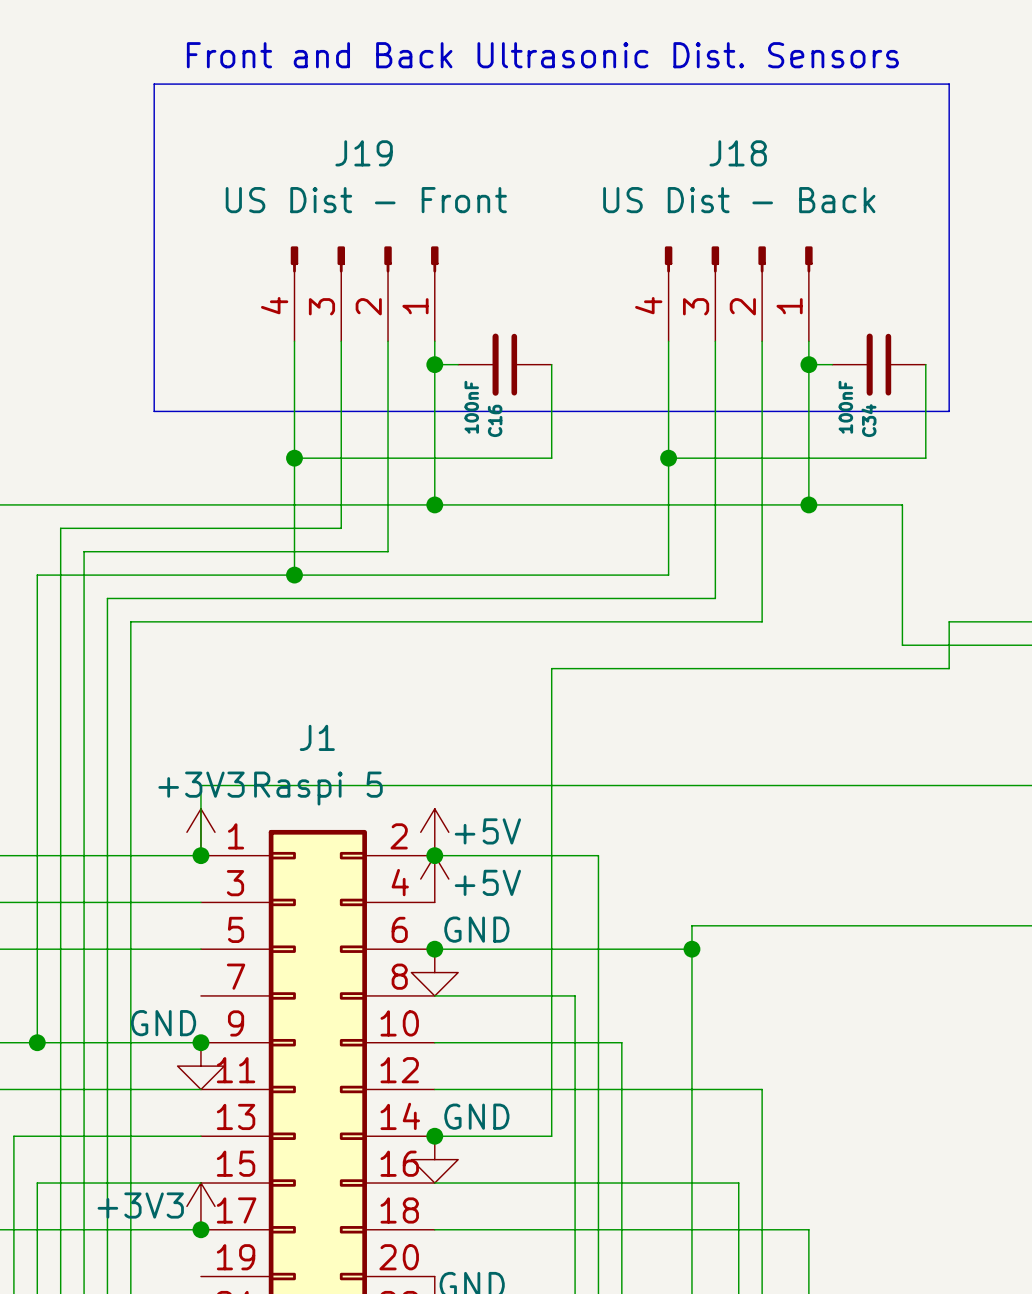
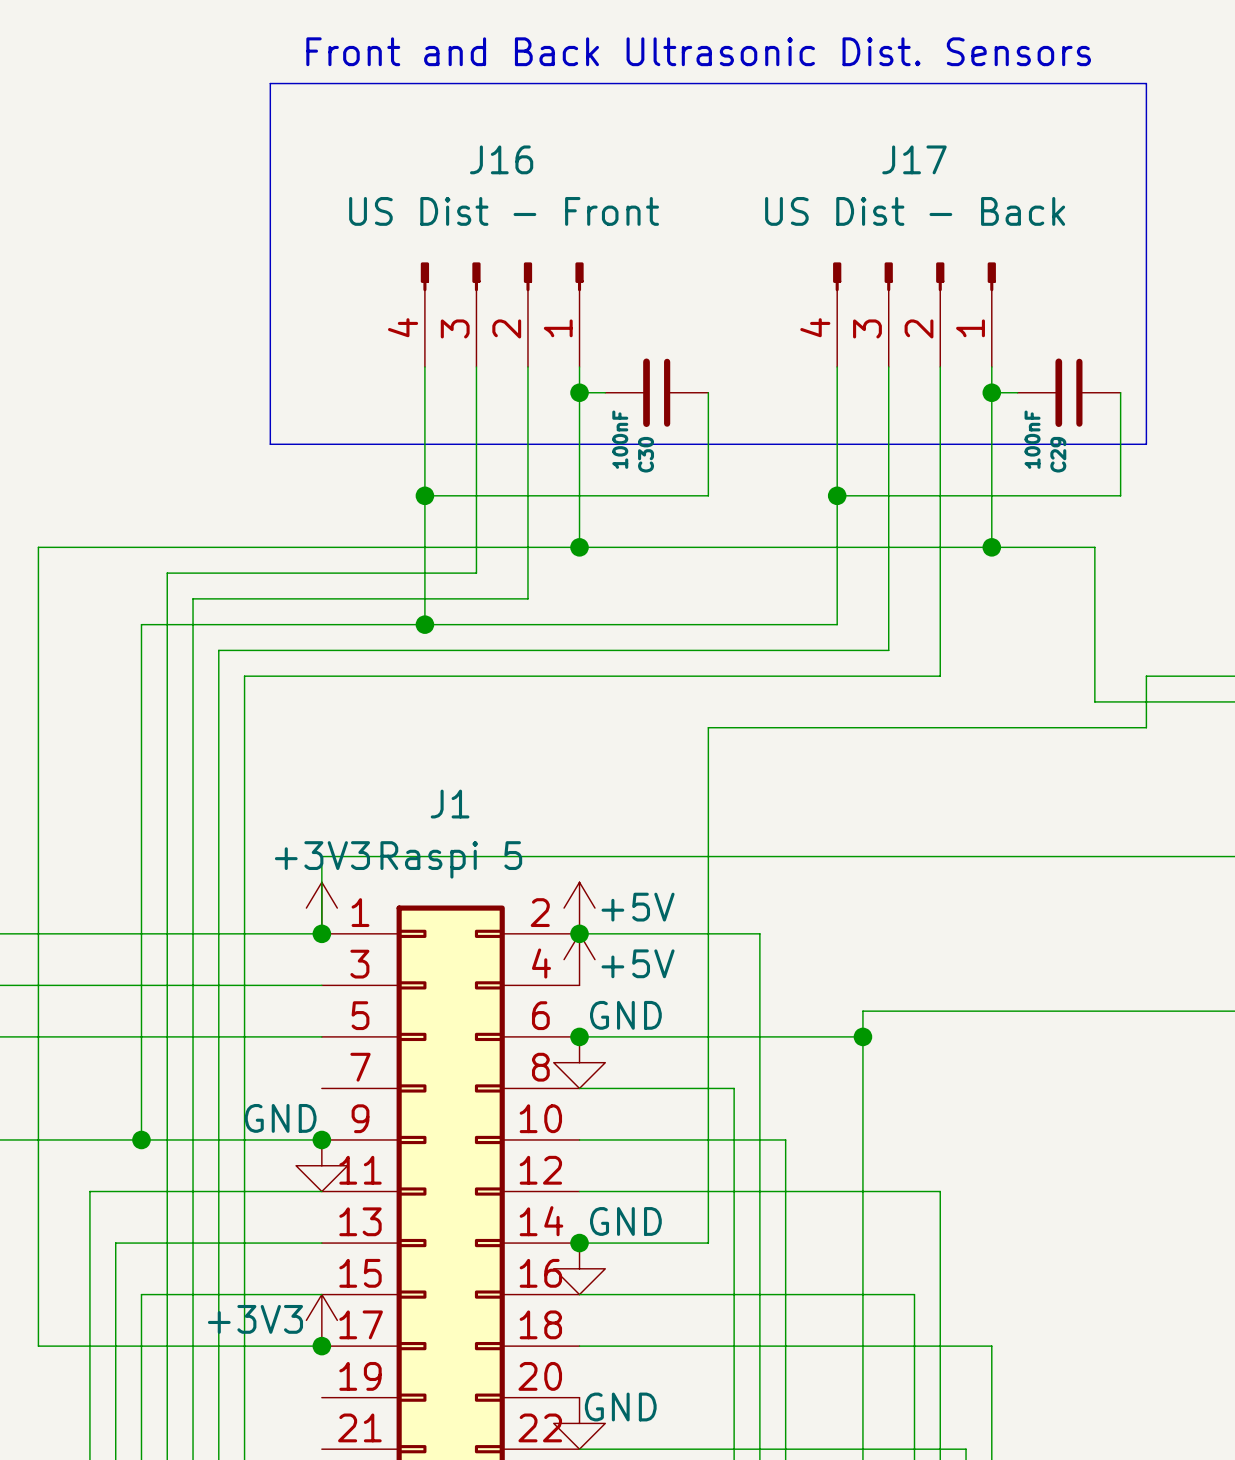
J19 name: J19 (364, 153) -> J16 (501, 159)
J18 name: J18 (738, 153) -> J17 (914, 159)
C16 name: C16 (495, 420) -> C30 (646, 454)
C34 name: C34 (868, 420) -> C29 (1058, 454)

